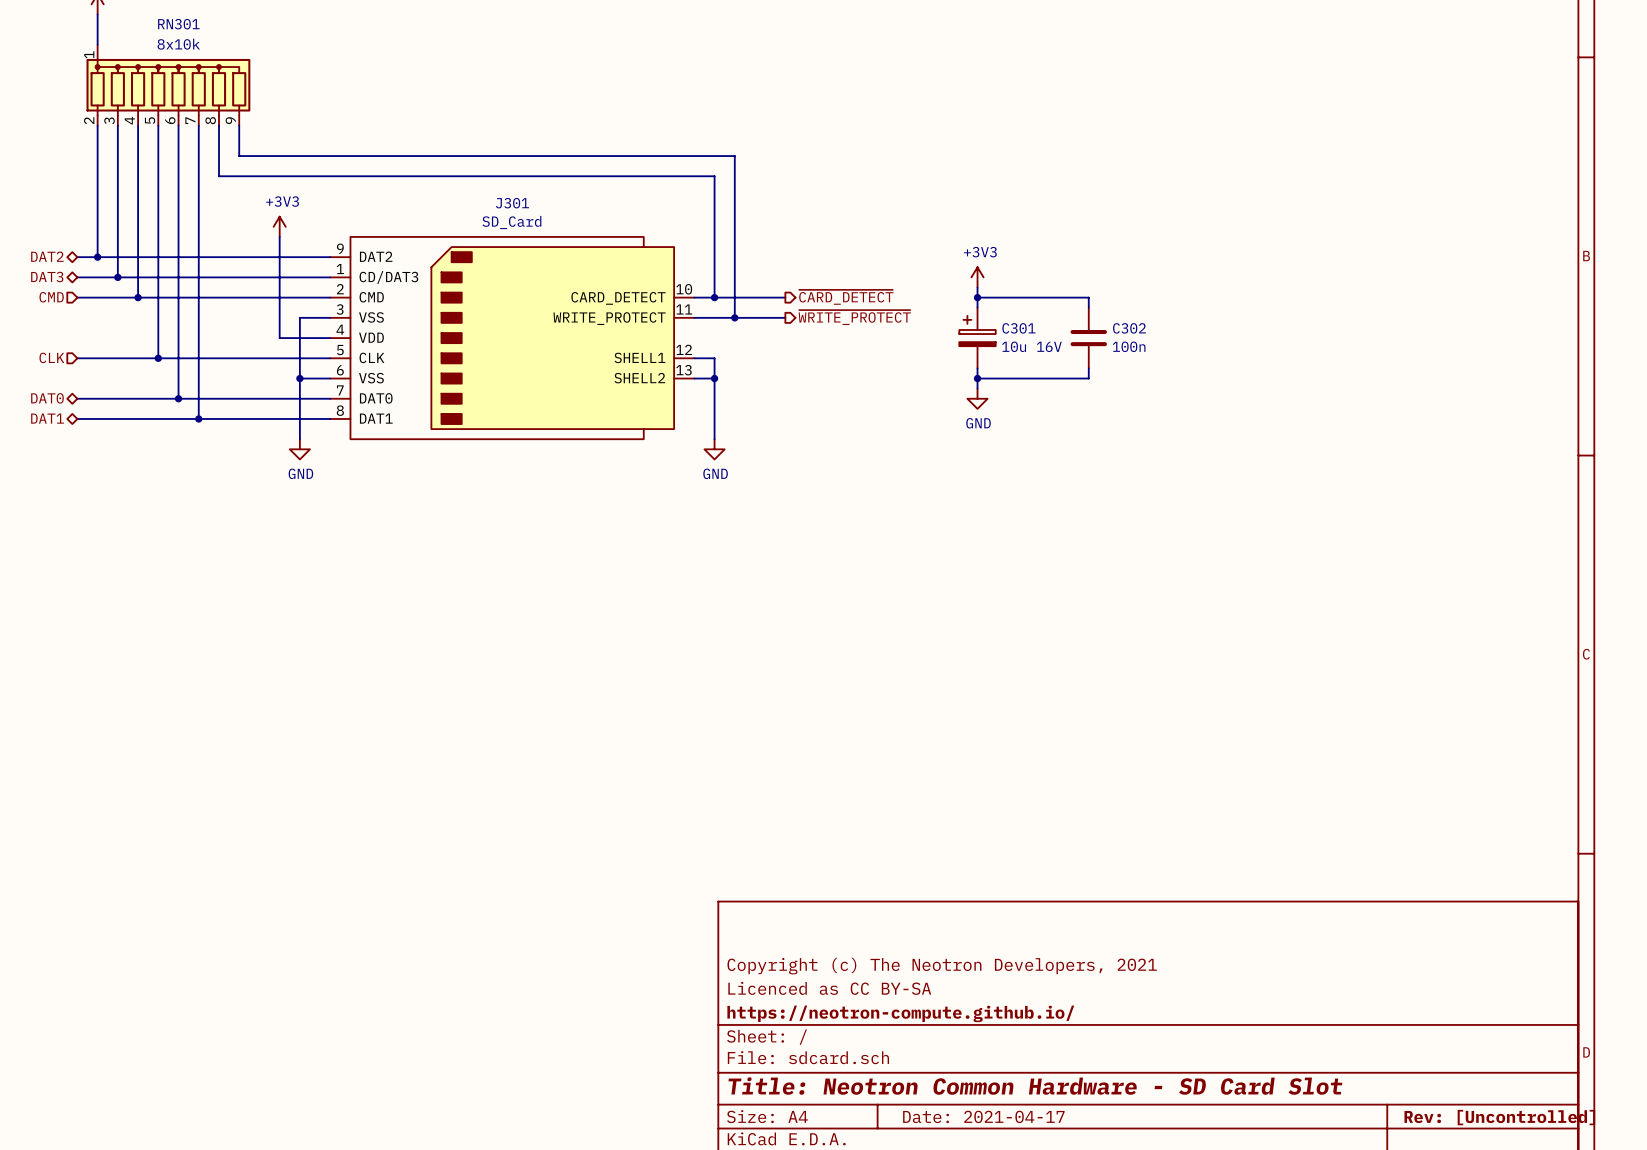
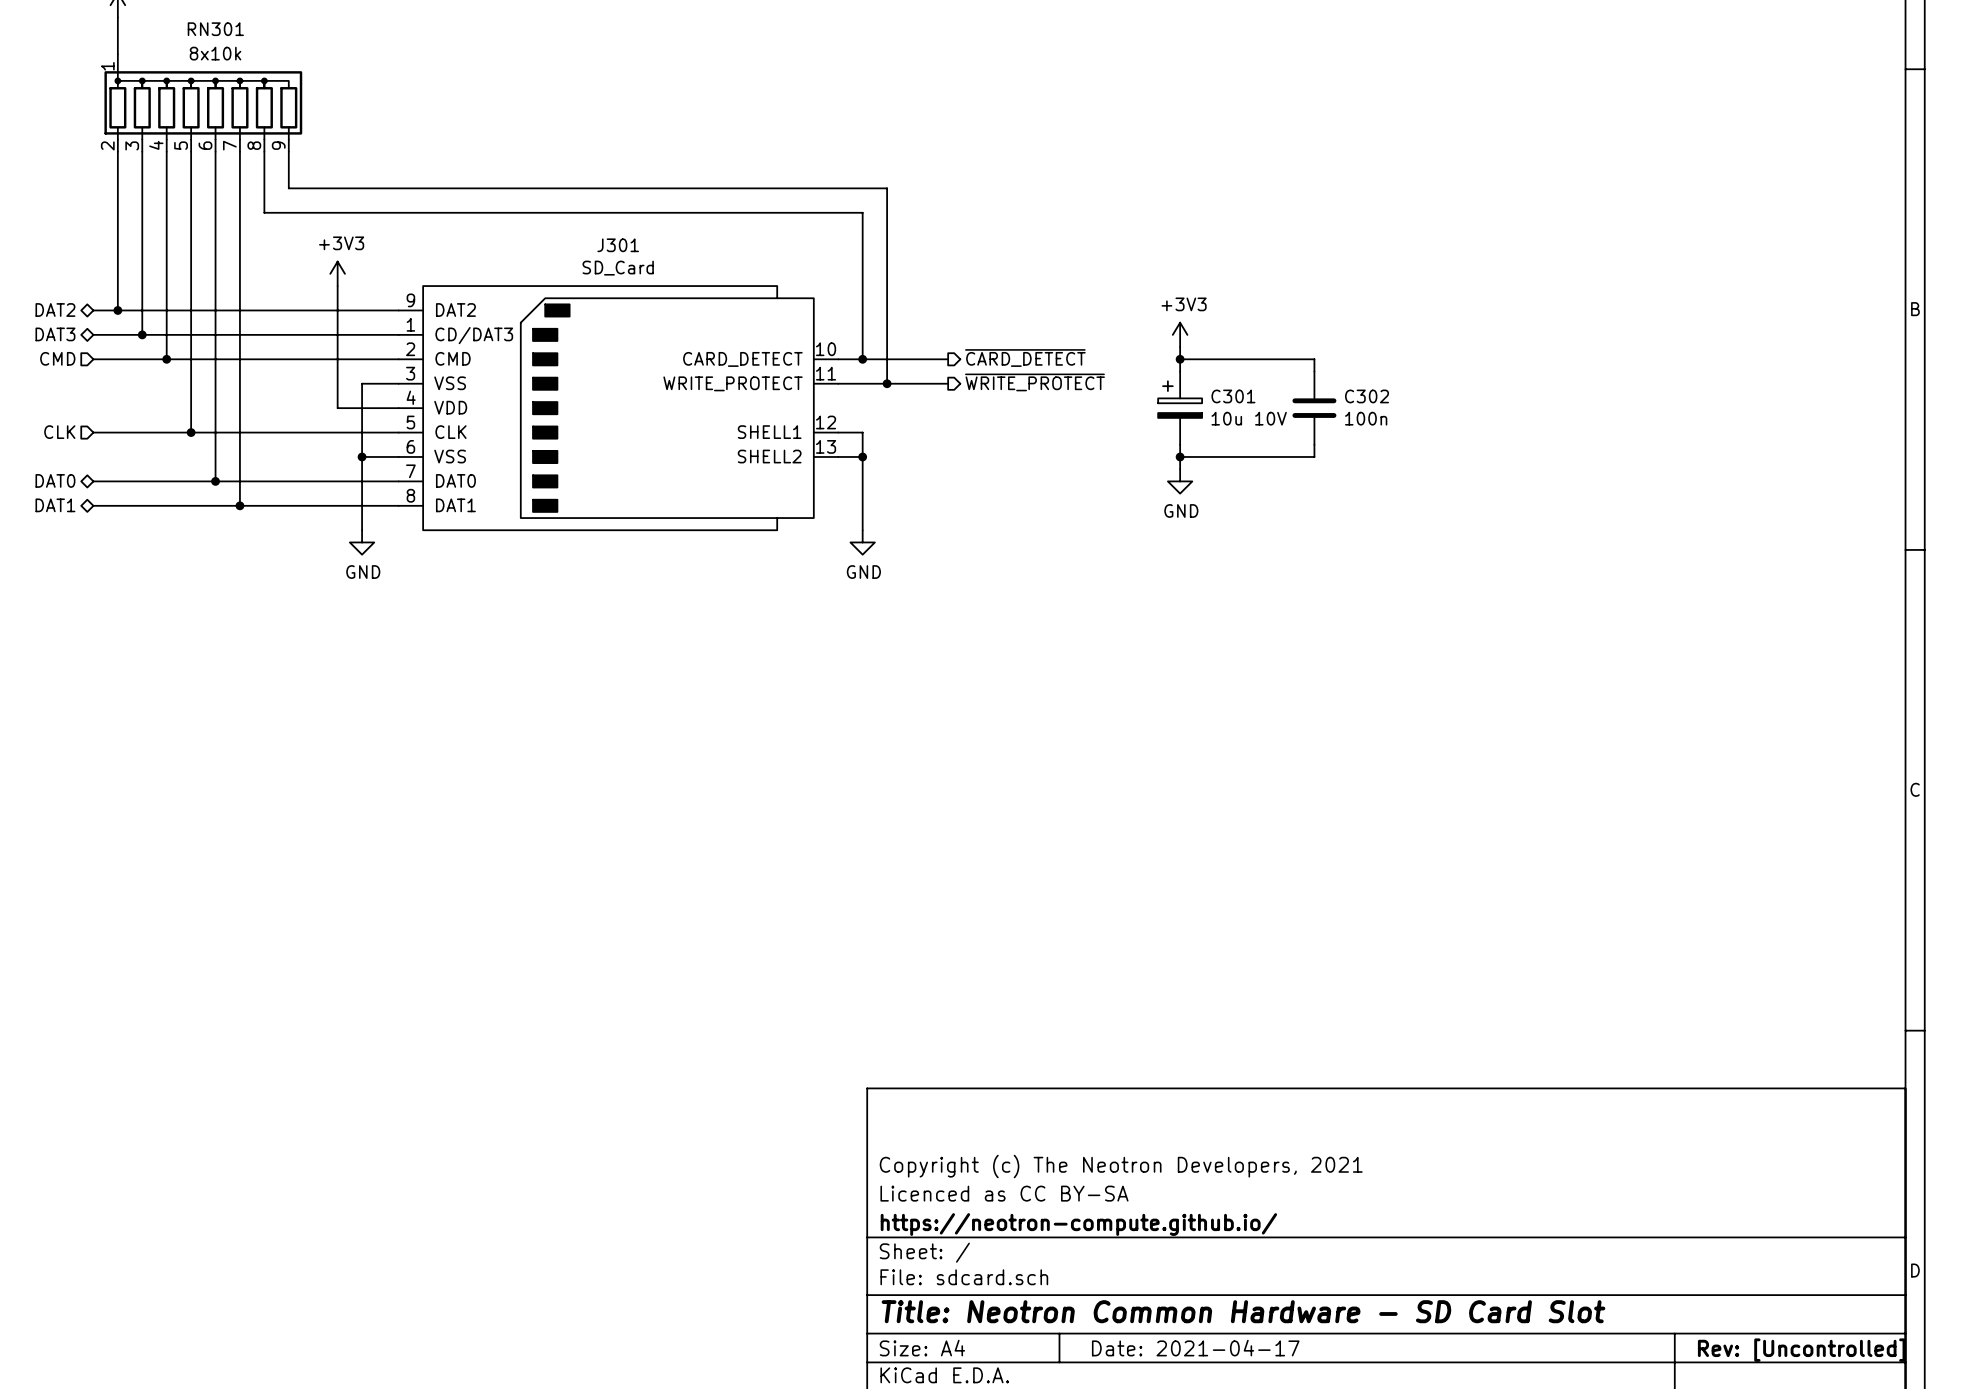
C301 value: 10u 16V (1031, 346) -> 10u 10V (1249, 418)

